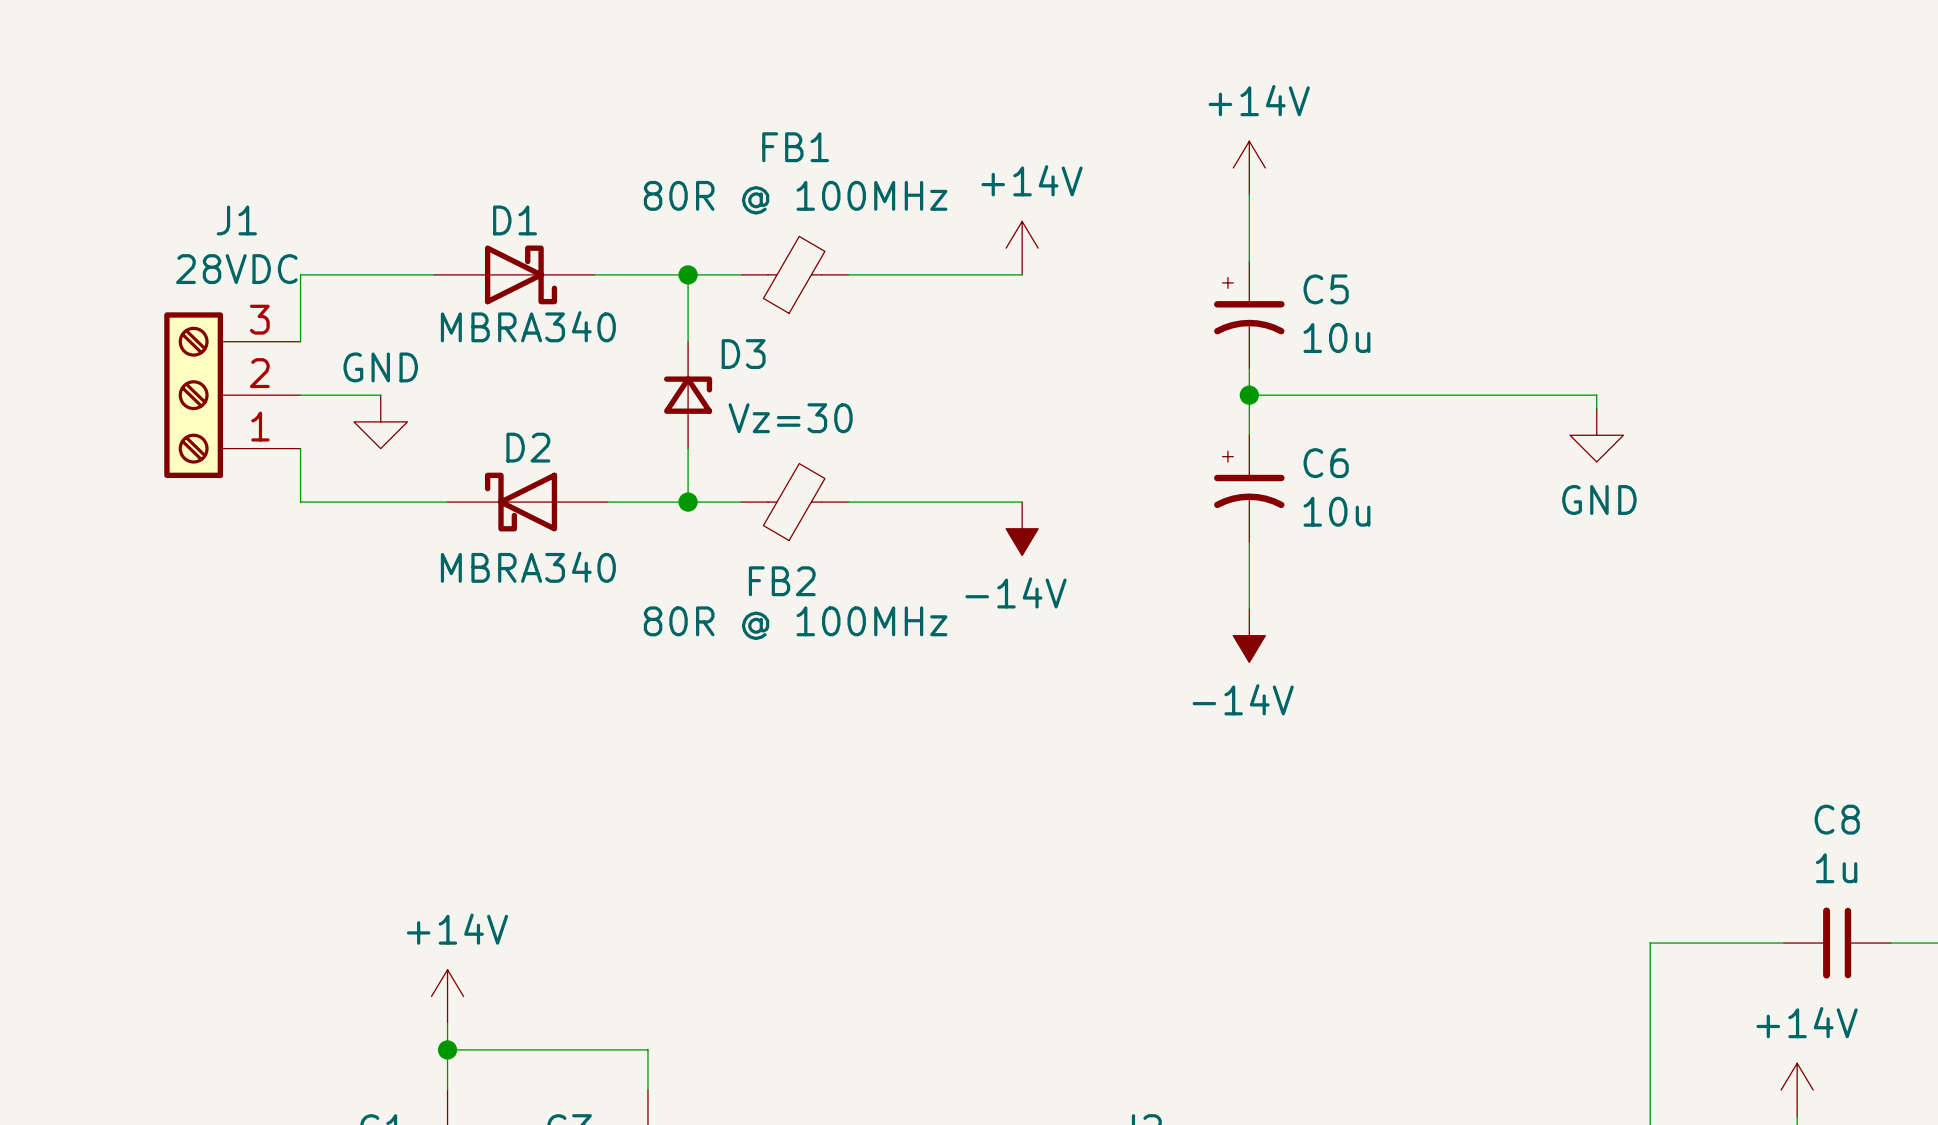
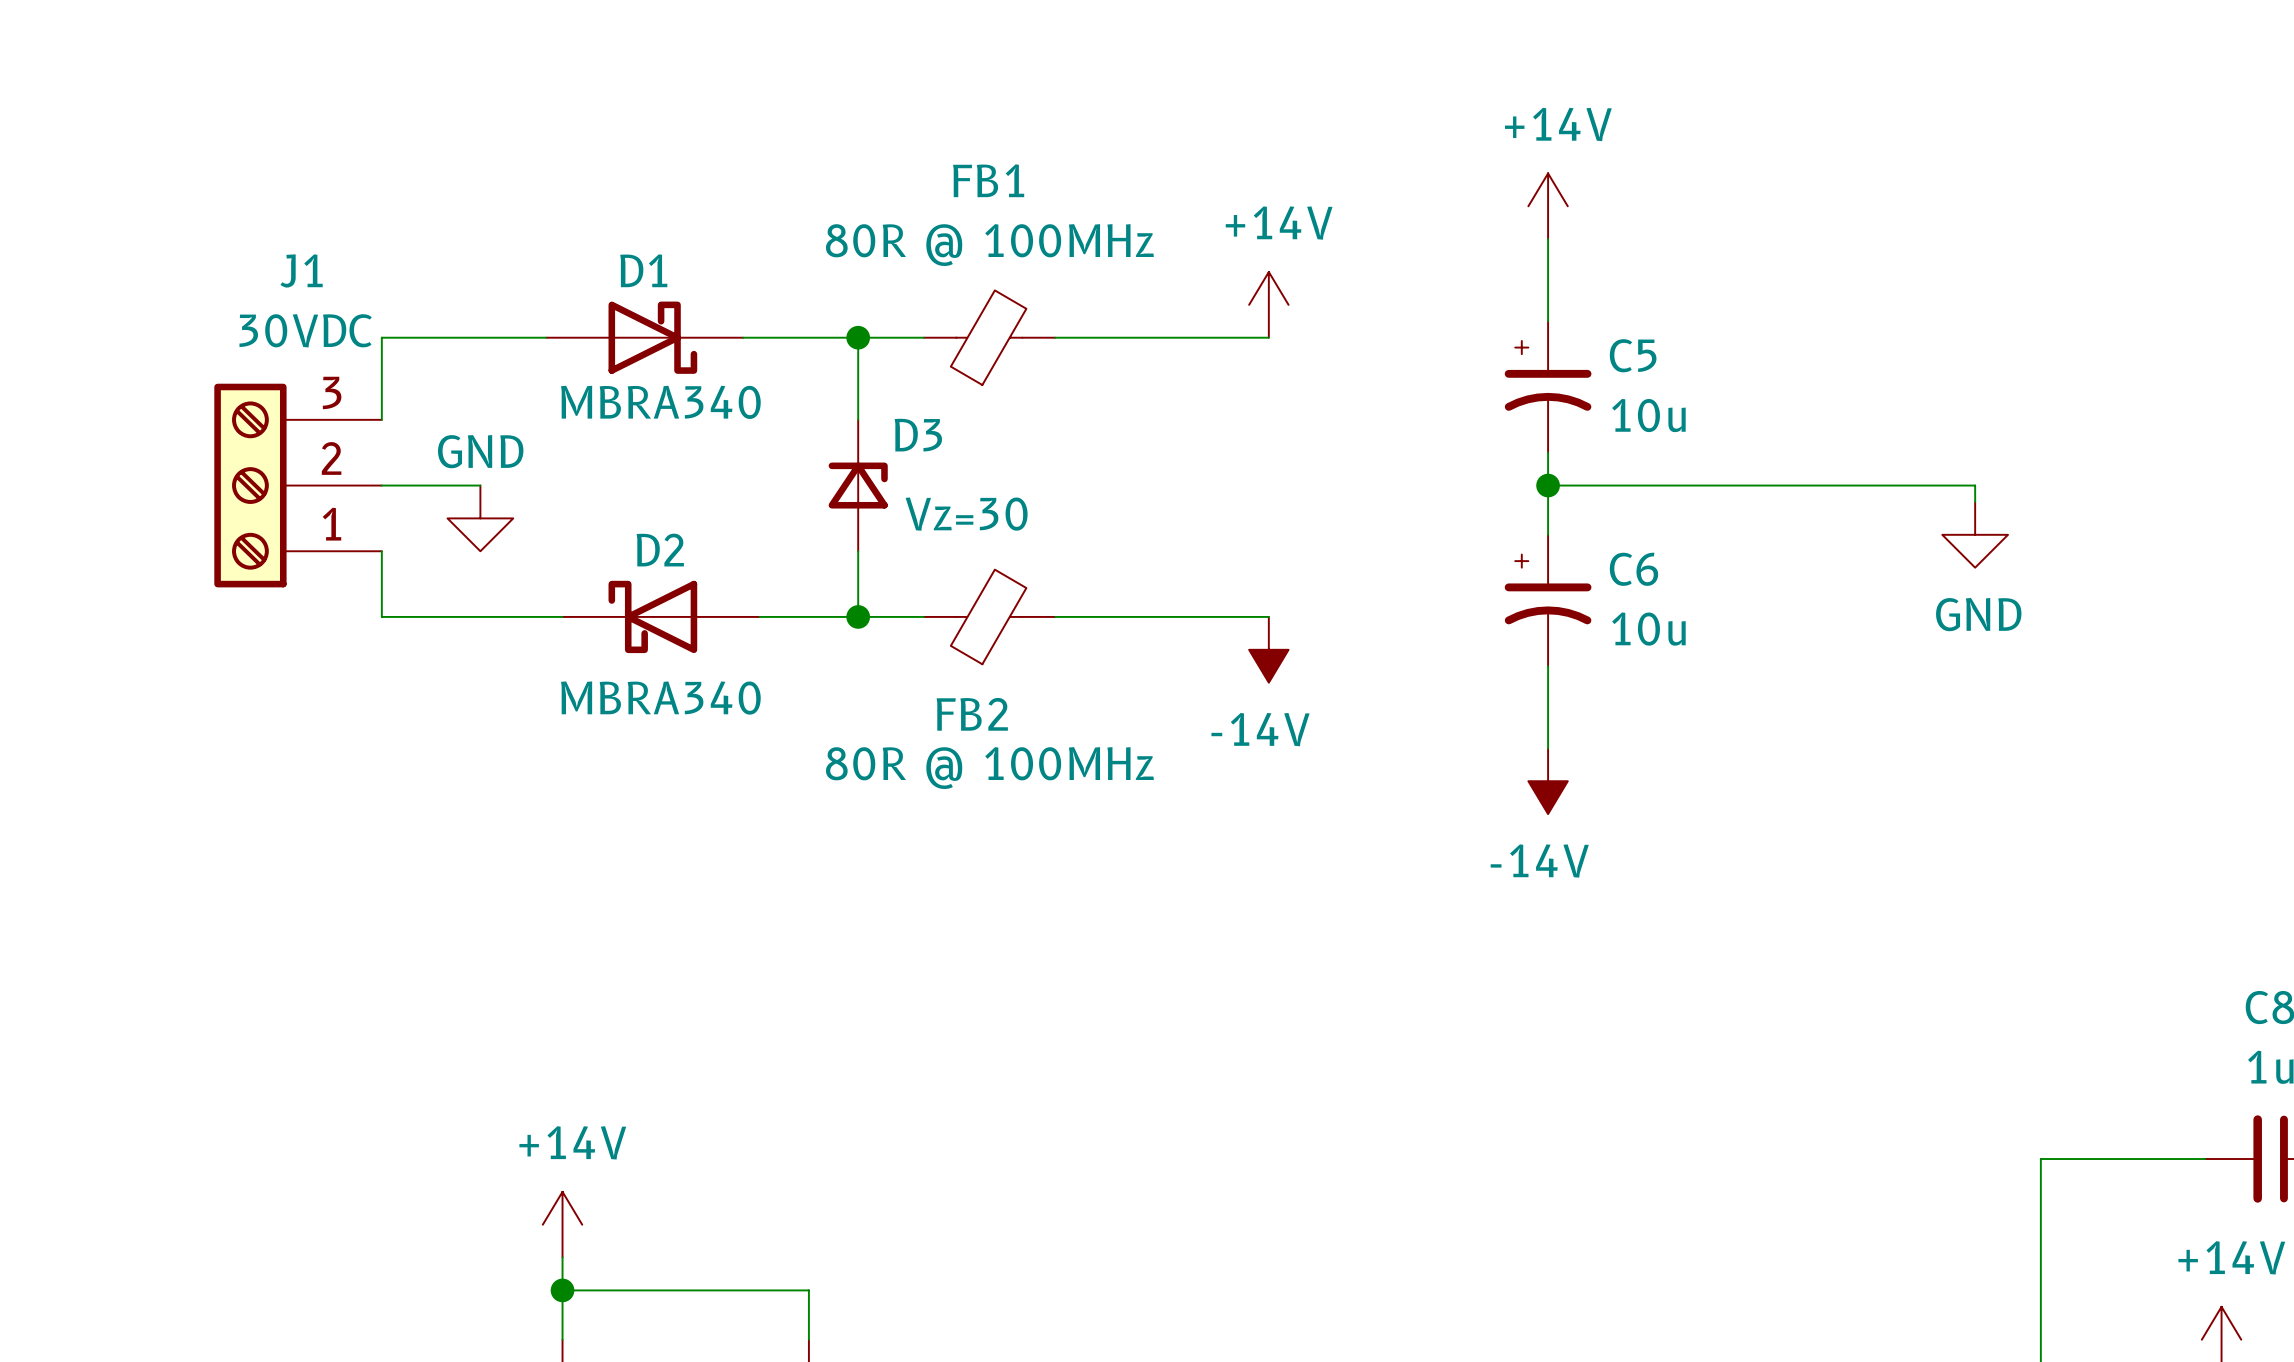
J1 value: 28VDC (236, 269) -> 30VDC (305, 330)

